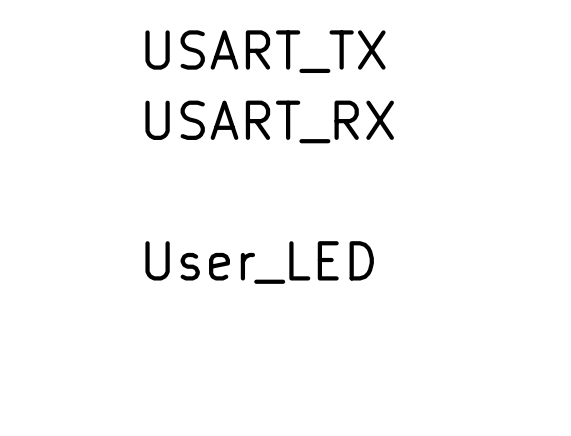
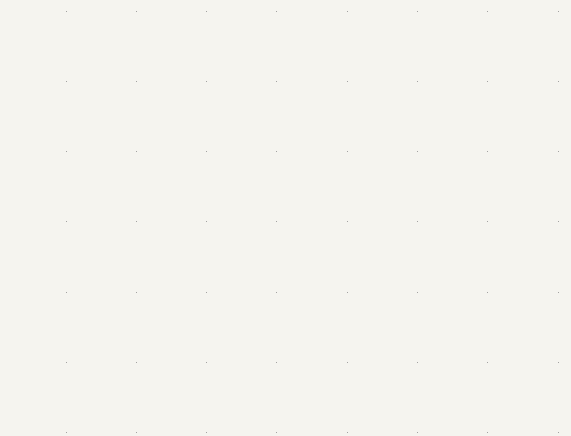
label: USART_TX (265, 51) -> none
label: USART_RX (269, 121) -> none
label: User_LED (259, 262) -> none

